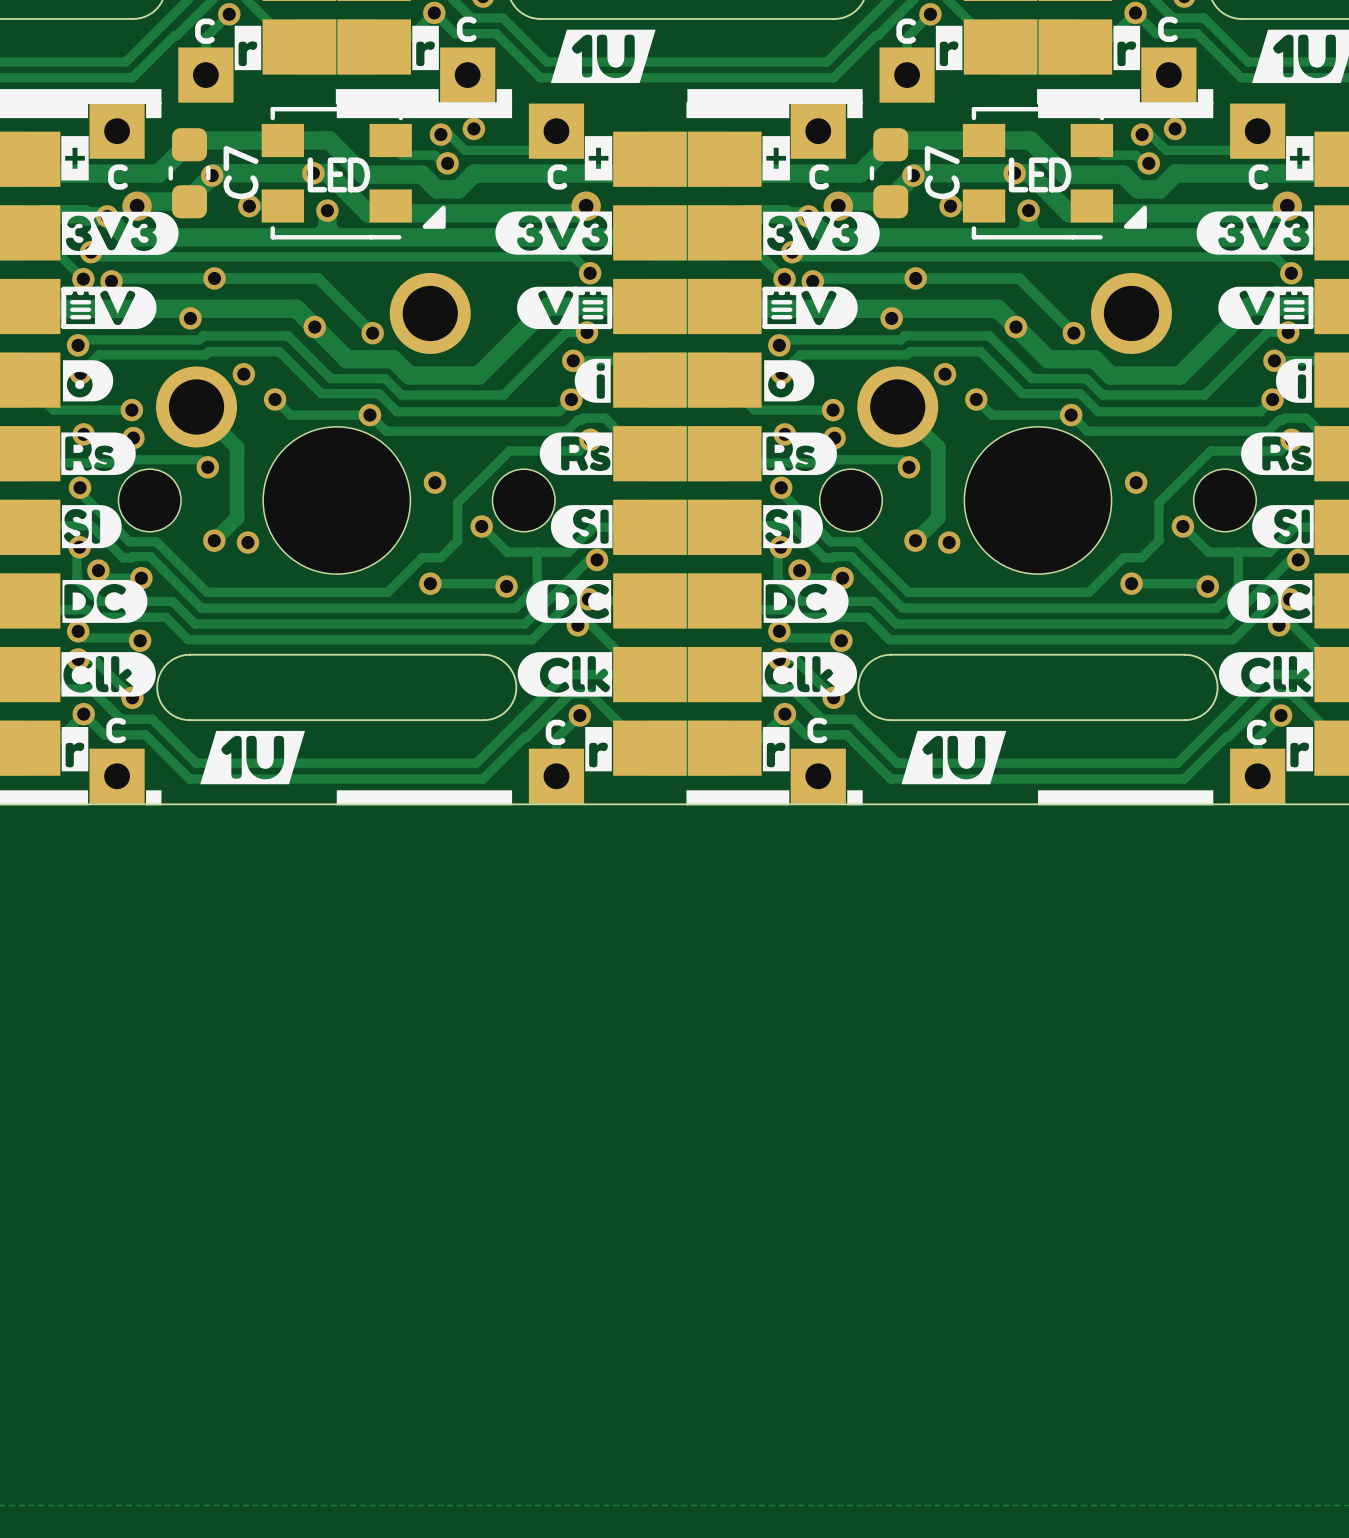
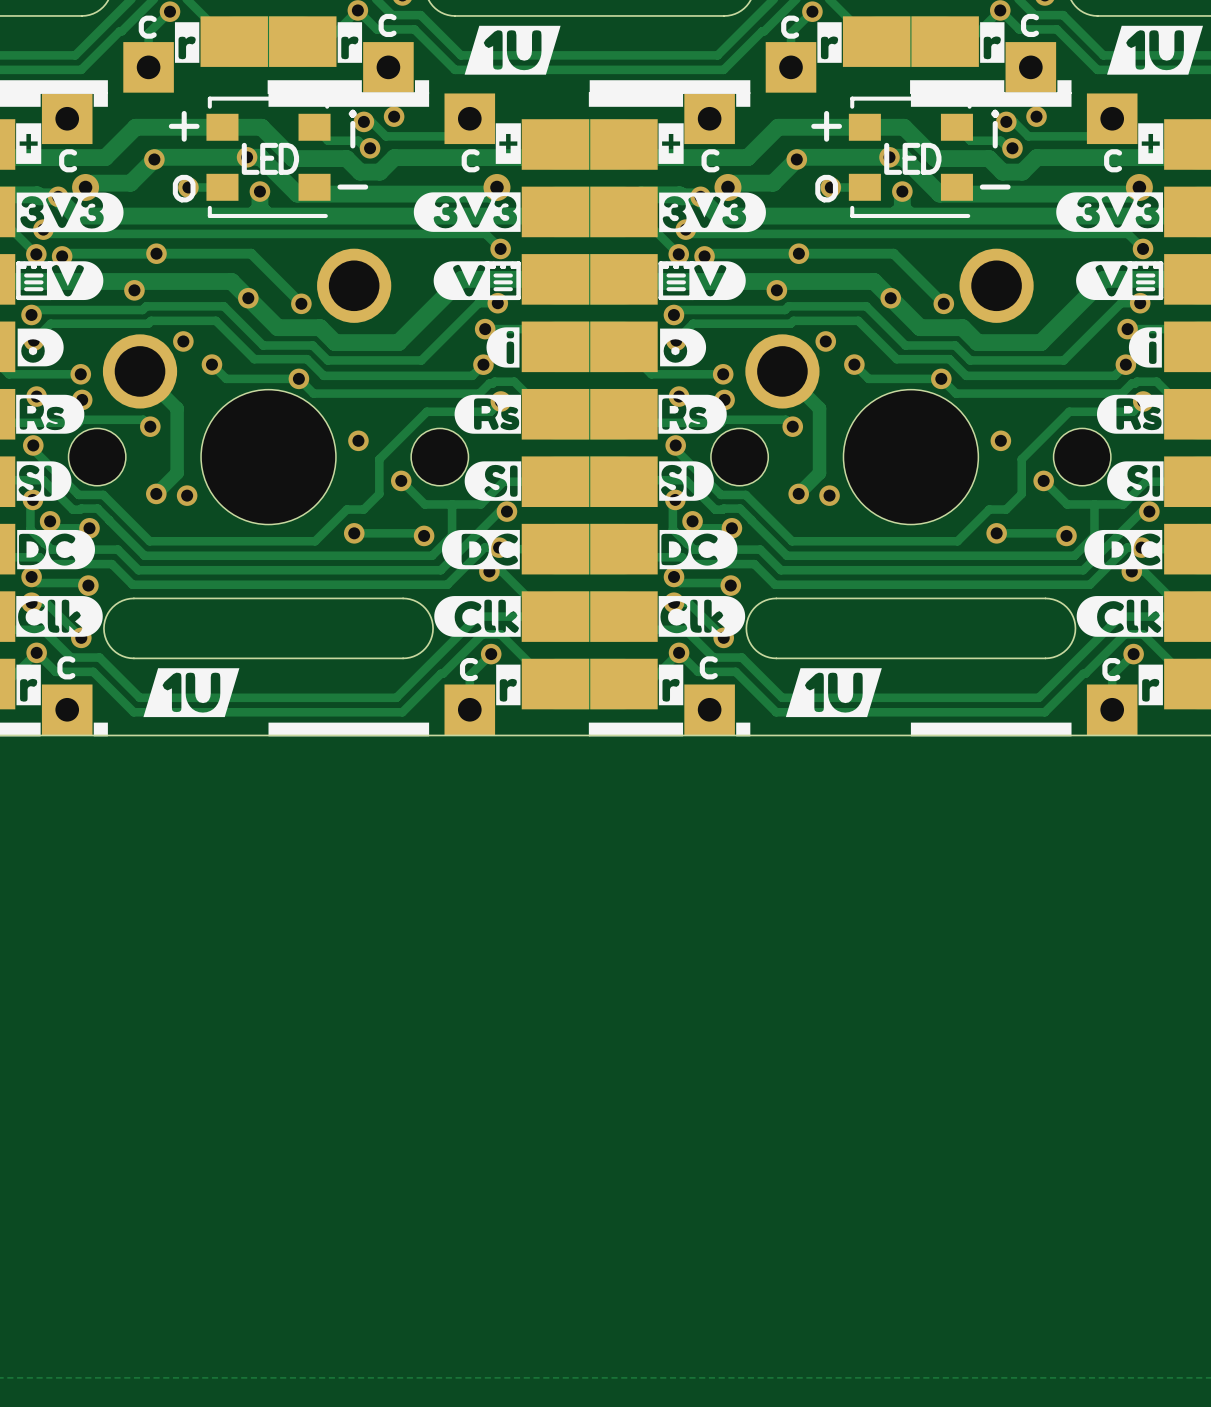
part footprint: [261, 106, 446, 240] -> [206, 96, 331, 219]
part footprint: [962, 106, 1147, 240] -> [848, 96, 973, 219]
C7: (189, 173) -> none
C7: (890, 173) -> none

